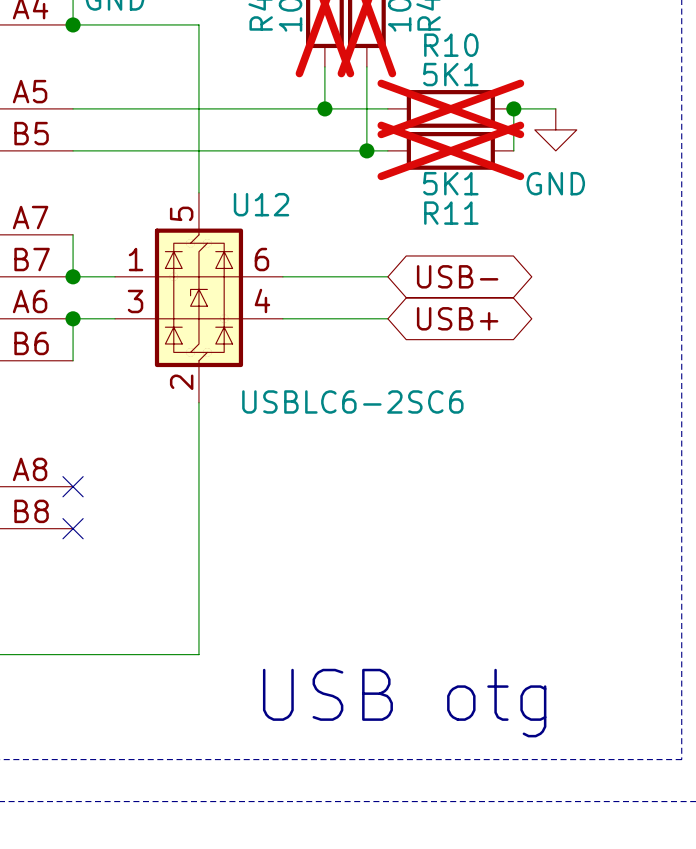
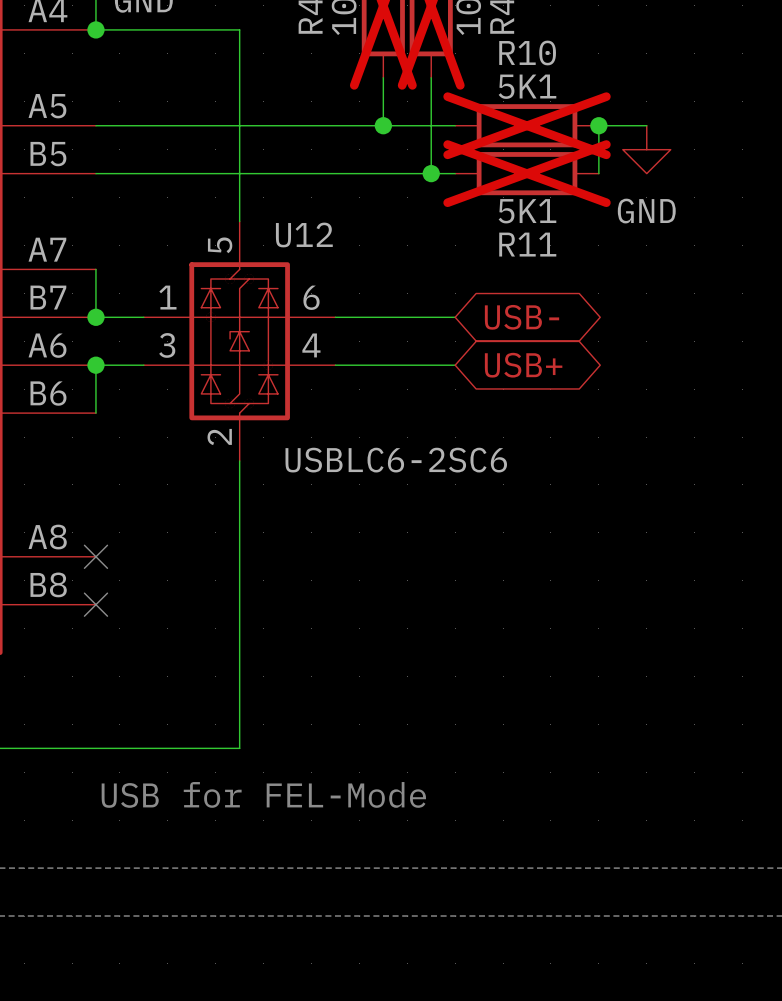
text: none -> USB for FEL-Mode (263, 794)
text: USB otg (404, 703) -> none

